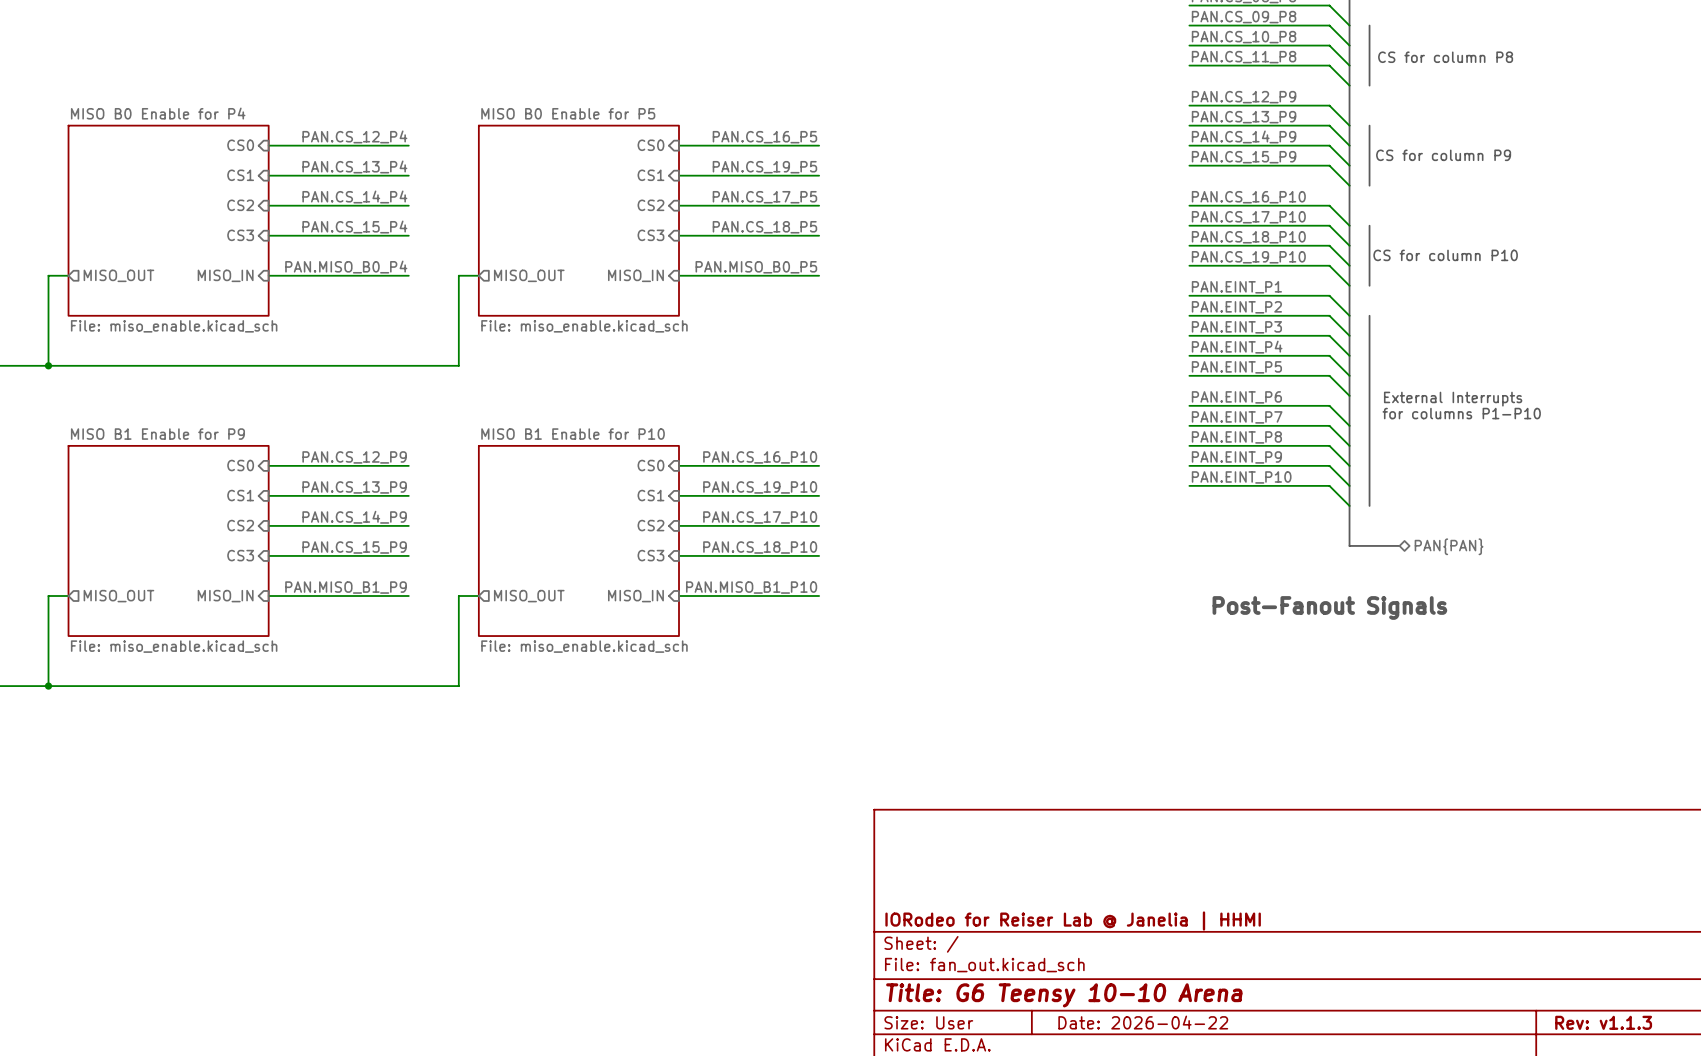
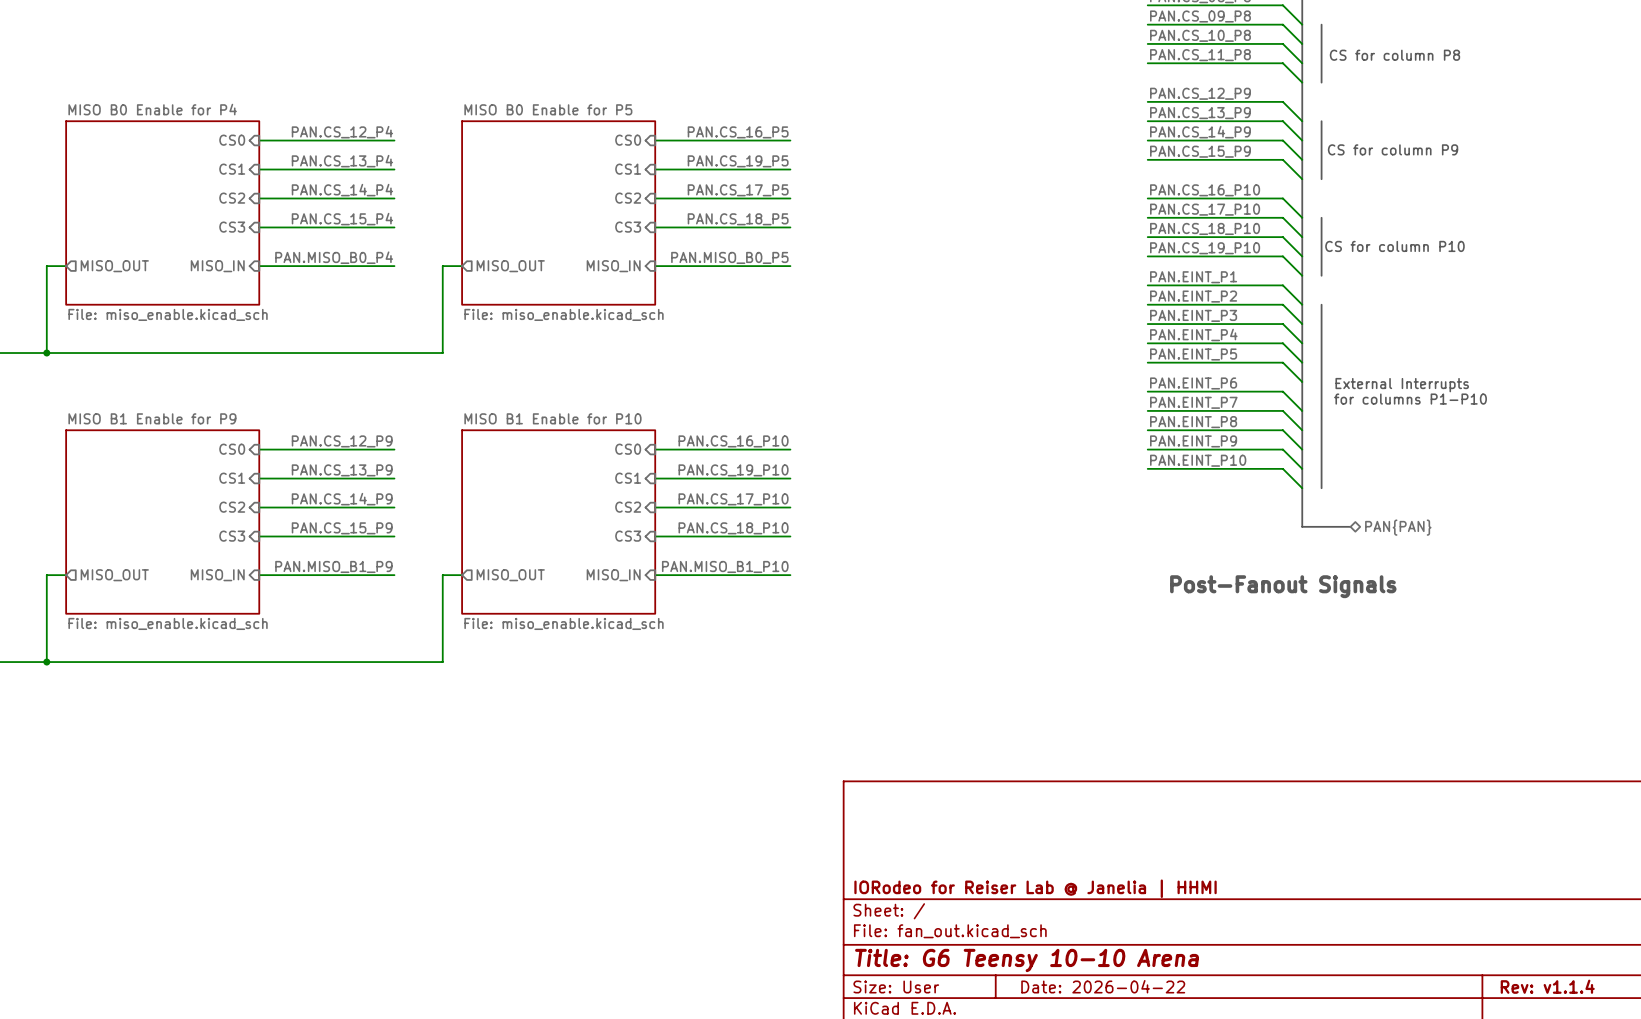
title block: Rev: v1.1.3 (1603, 1022) -> Rev: v1.1.4 (1547, 986)

